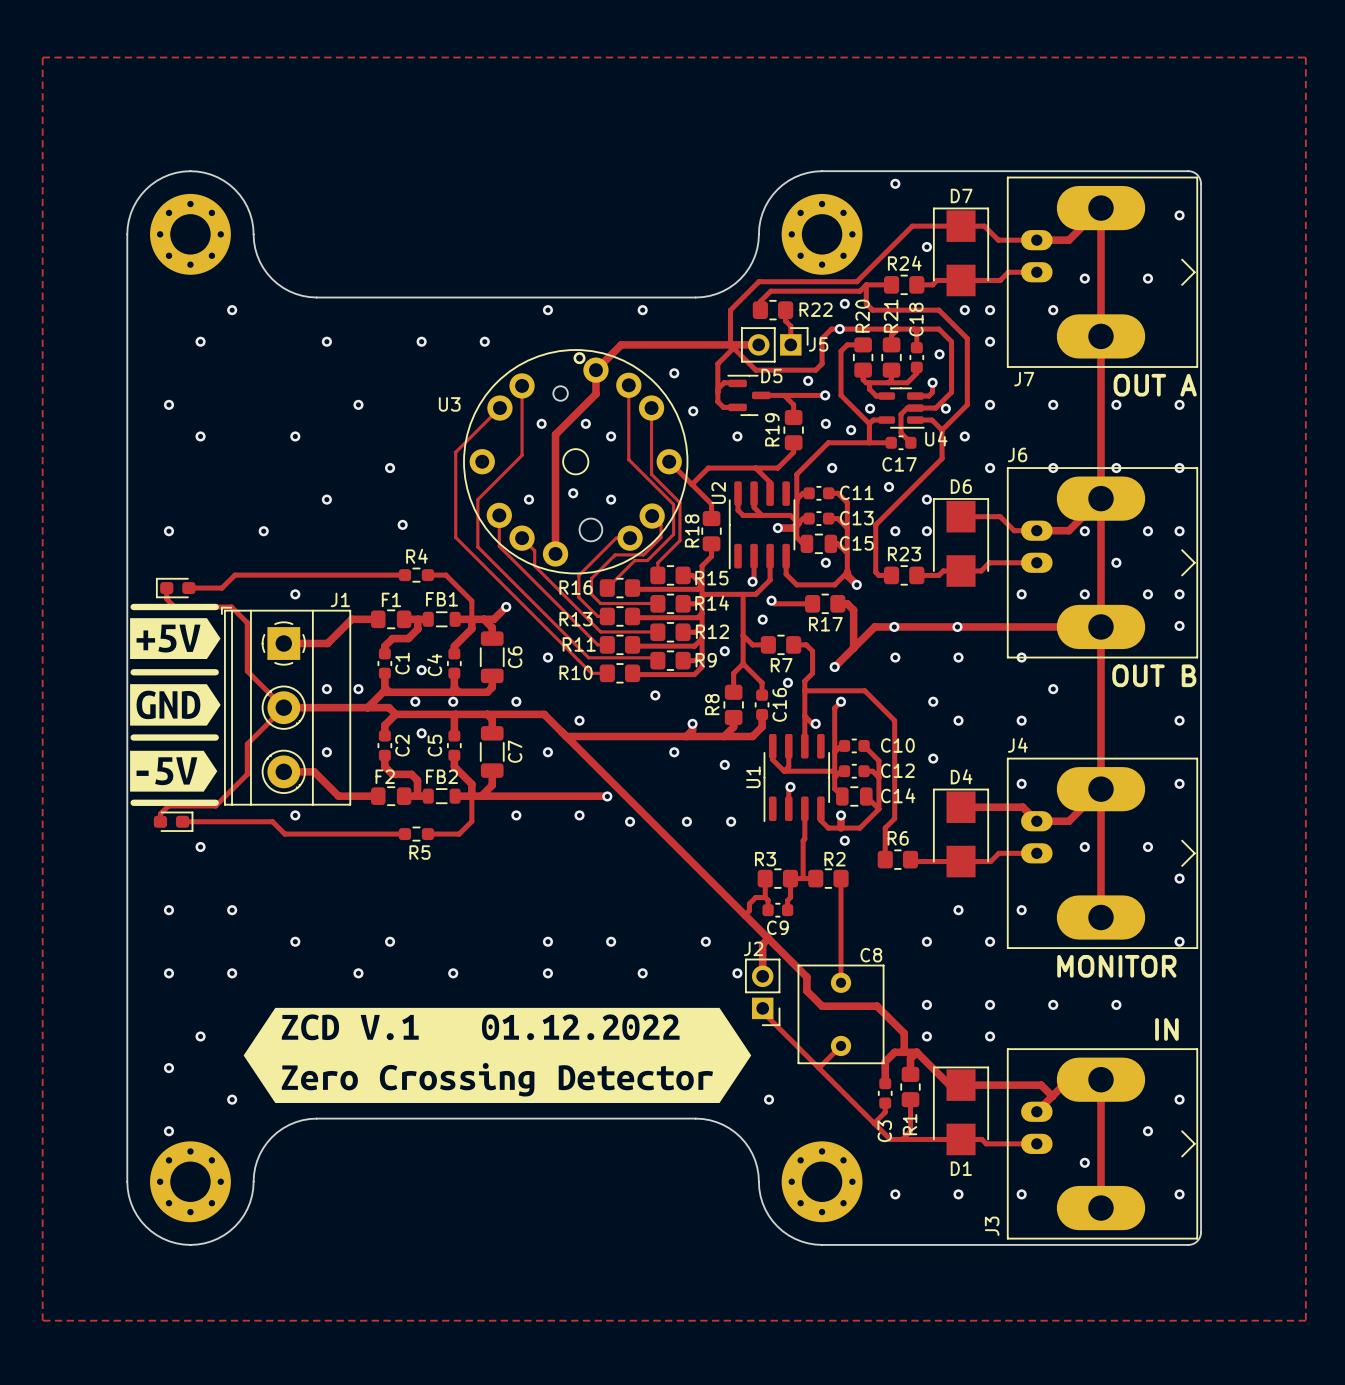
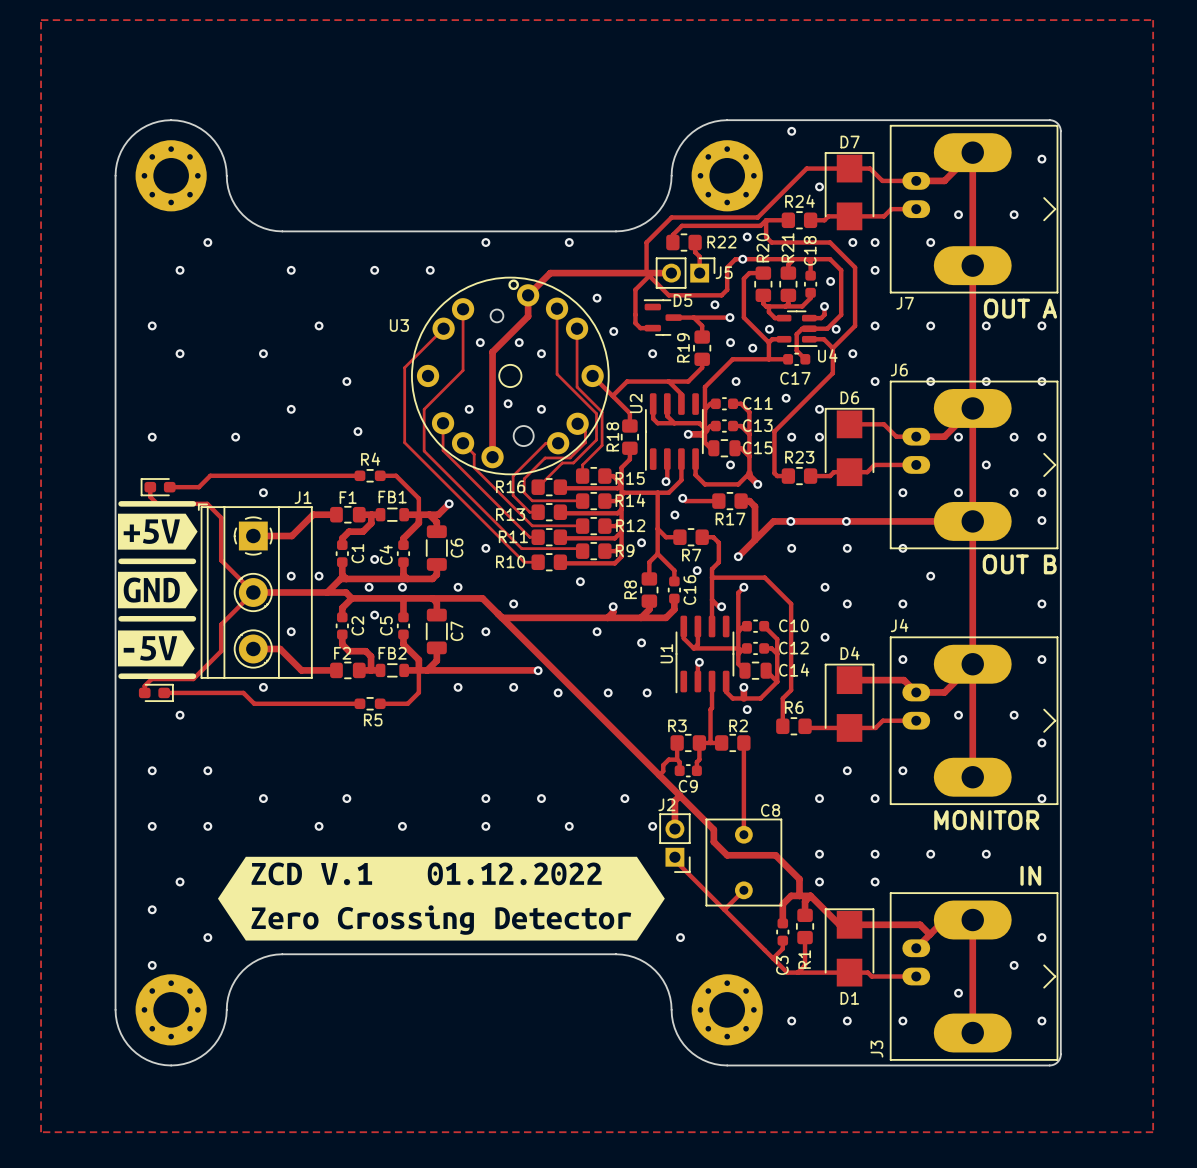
track: (737, 383) (724, 382) (717, 389) -> none

